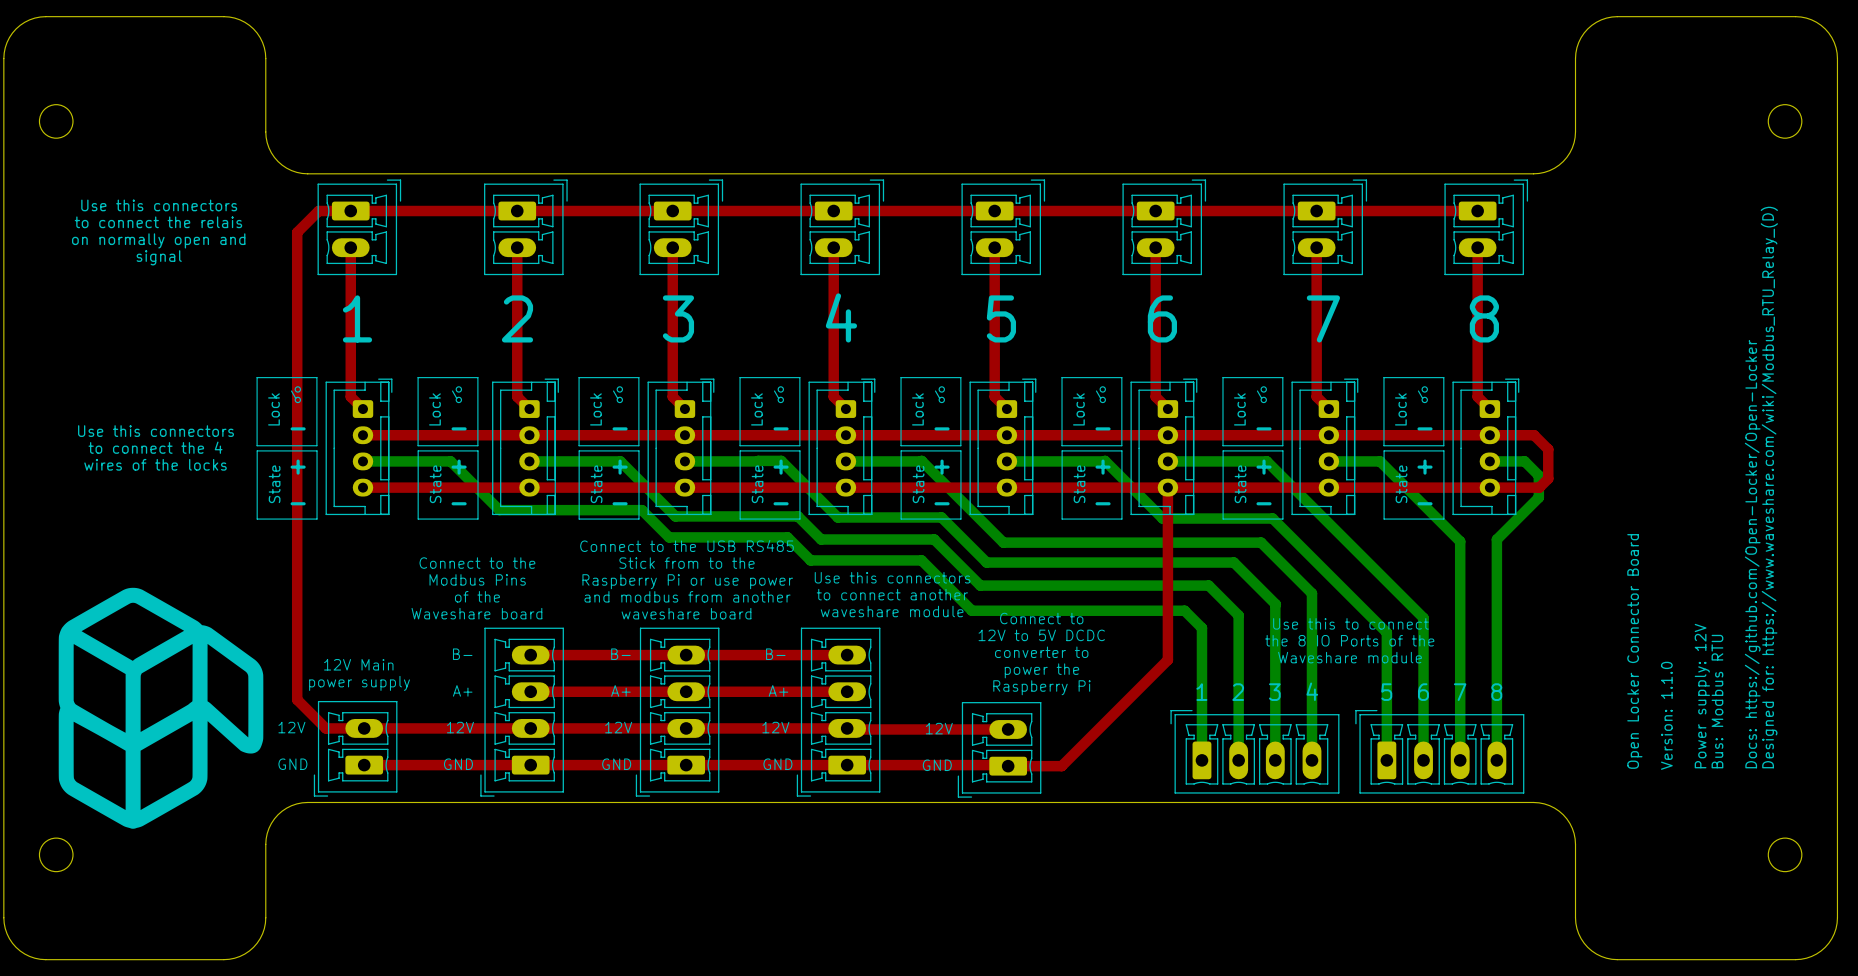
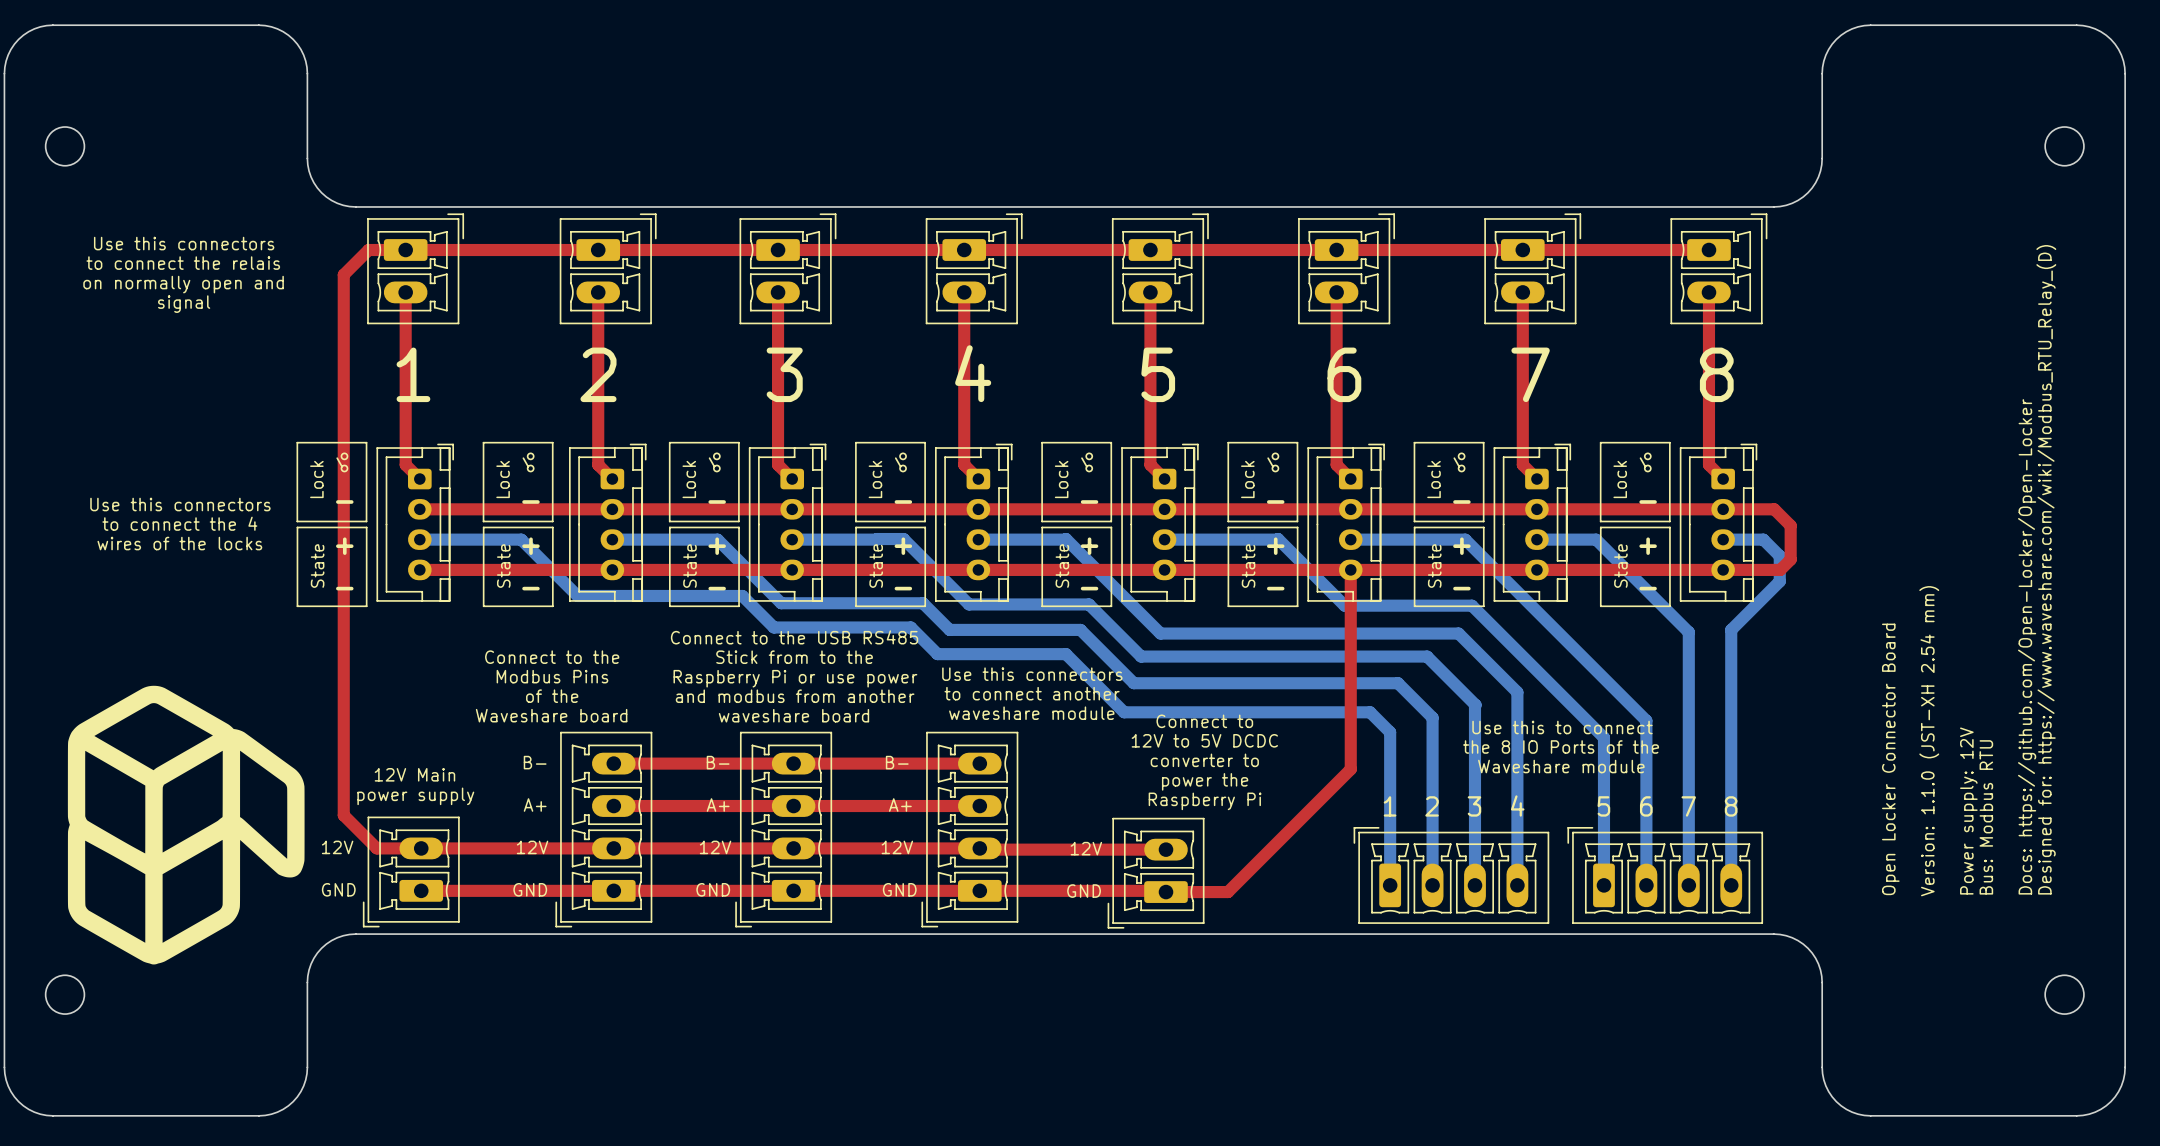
text: Version: 1.1.0 (1666, 715) -> Version: 1.1.0 (JST-XH 2.54 mm) (1929, 741)

